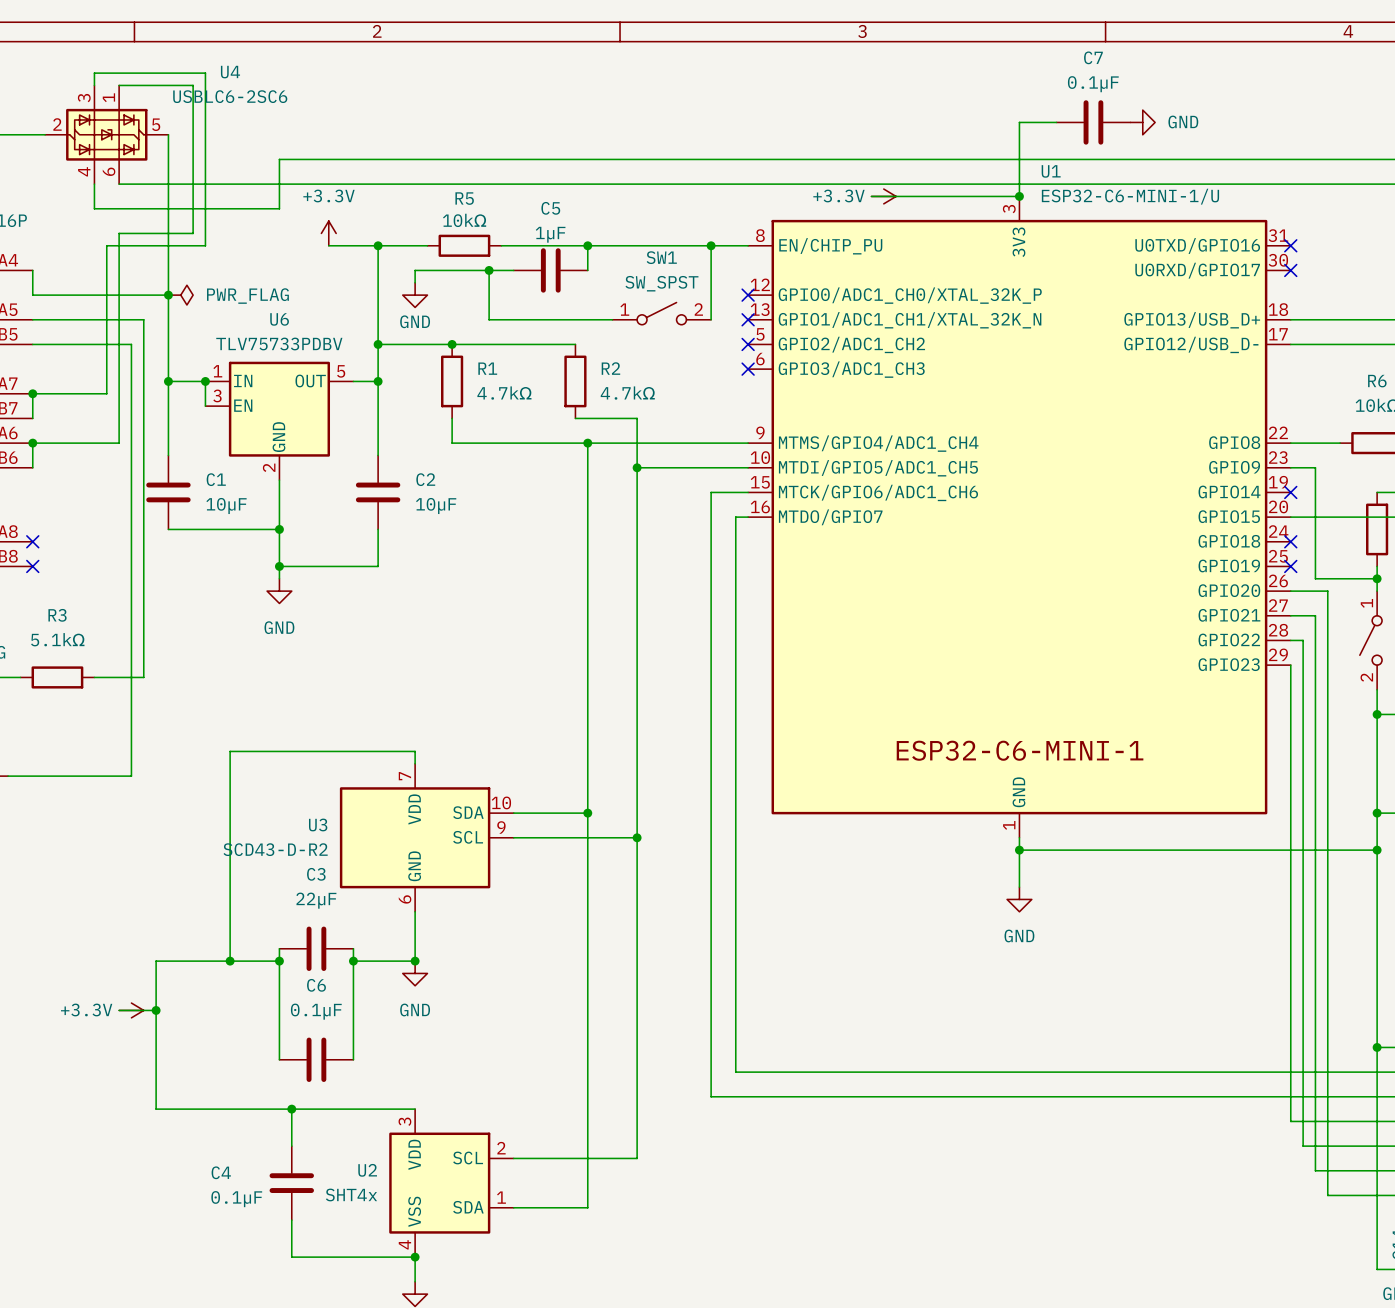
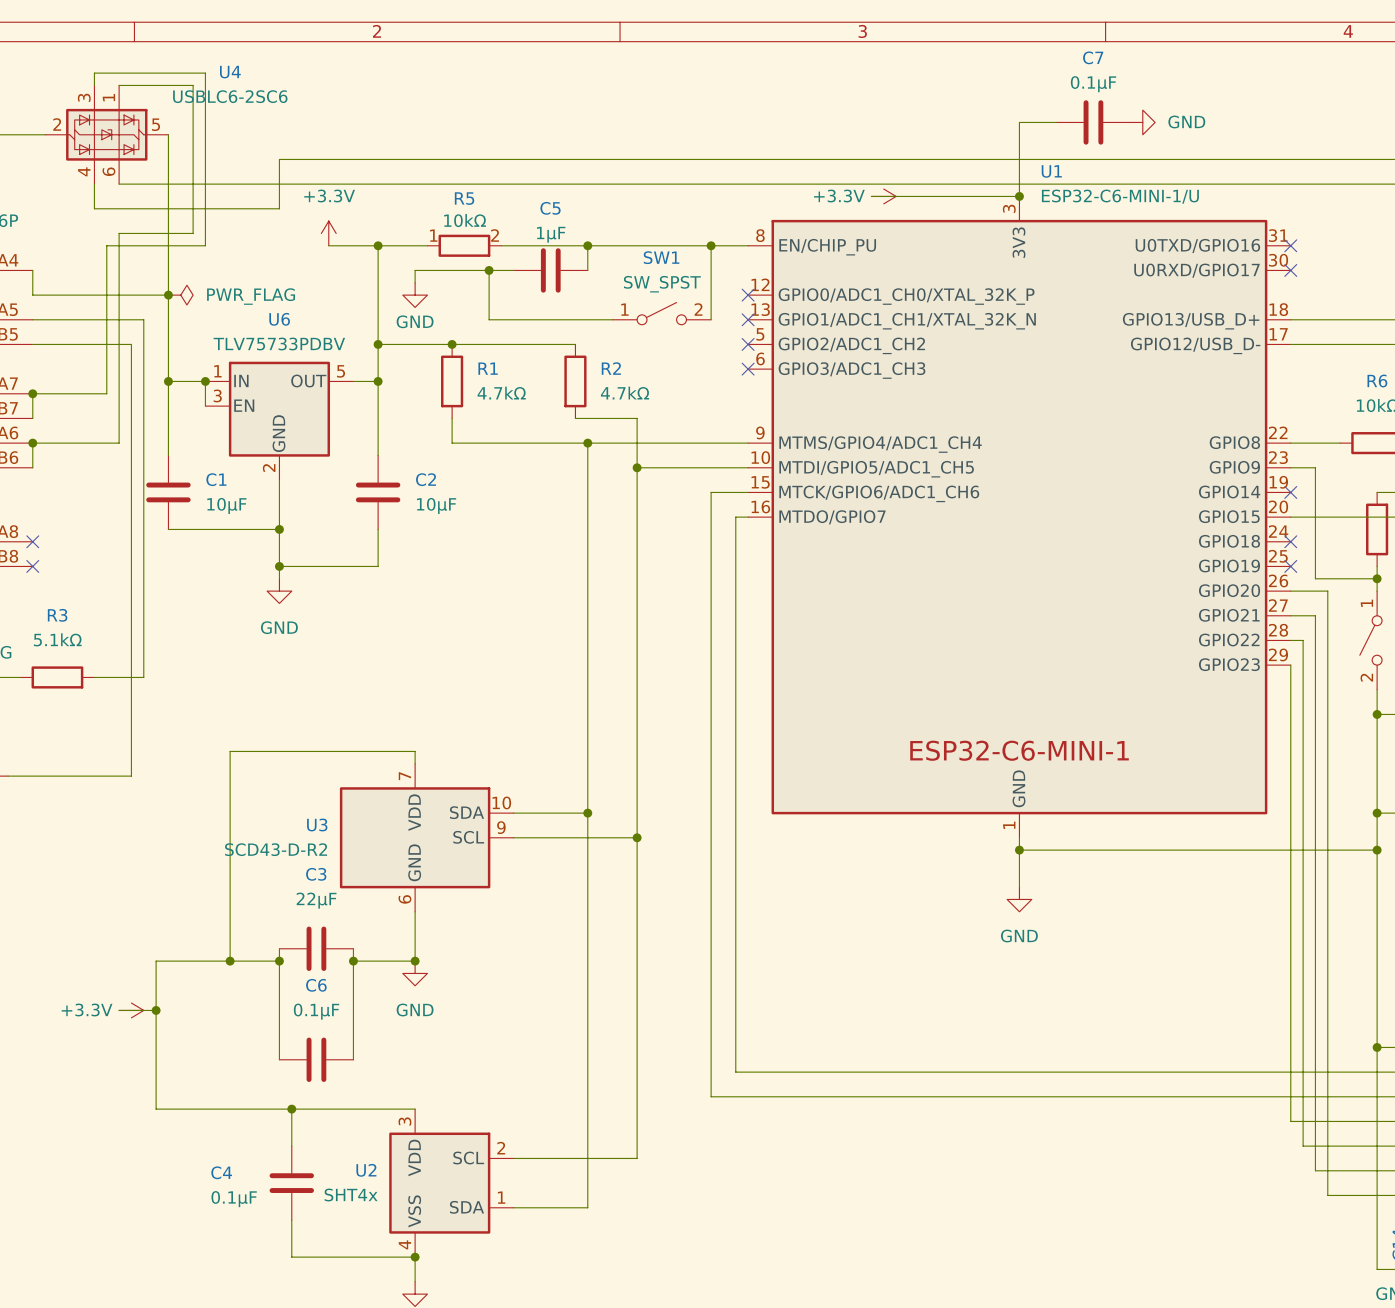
R5 pin number: none -> 1 (433, 235)
R5 pin number: none -> 2 (495, 235)

